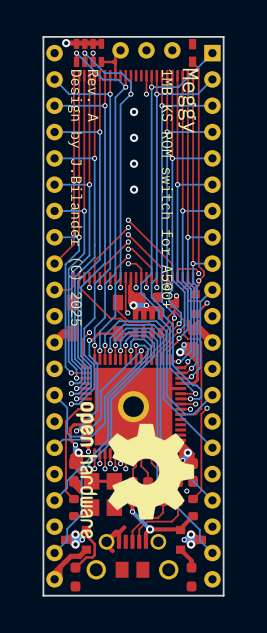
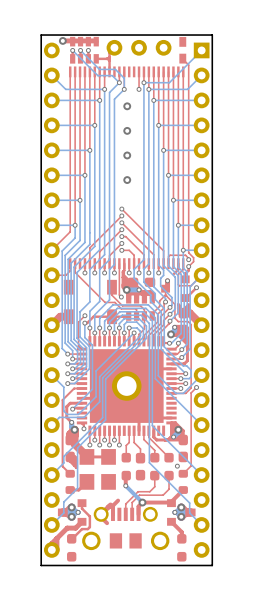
text: Rev. A (92, 95) -> none
text: Meggy (188, 100) -> none
text: 1MB KS ROM switch for A500+ (167, 188) -> none
text: Design by J.Bilander (C) 2025 (75, 197) -> none
drawing: [75, 402, 195, 539] -> none

